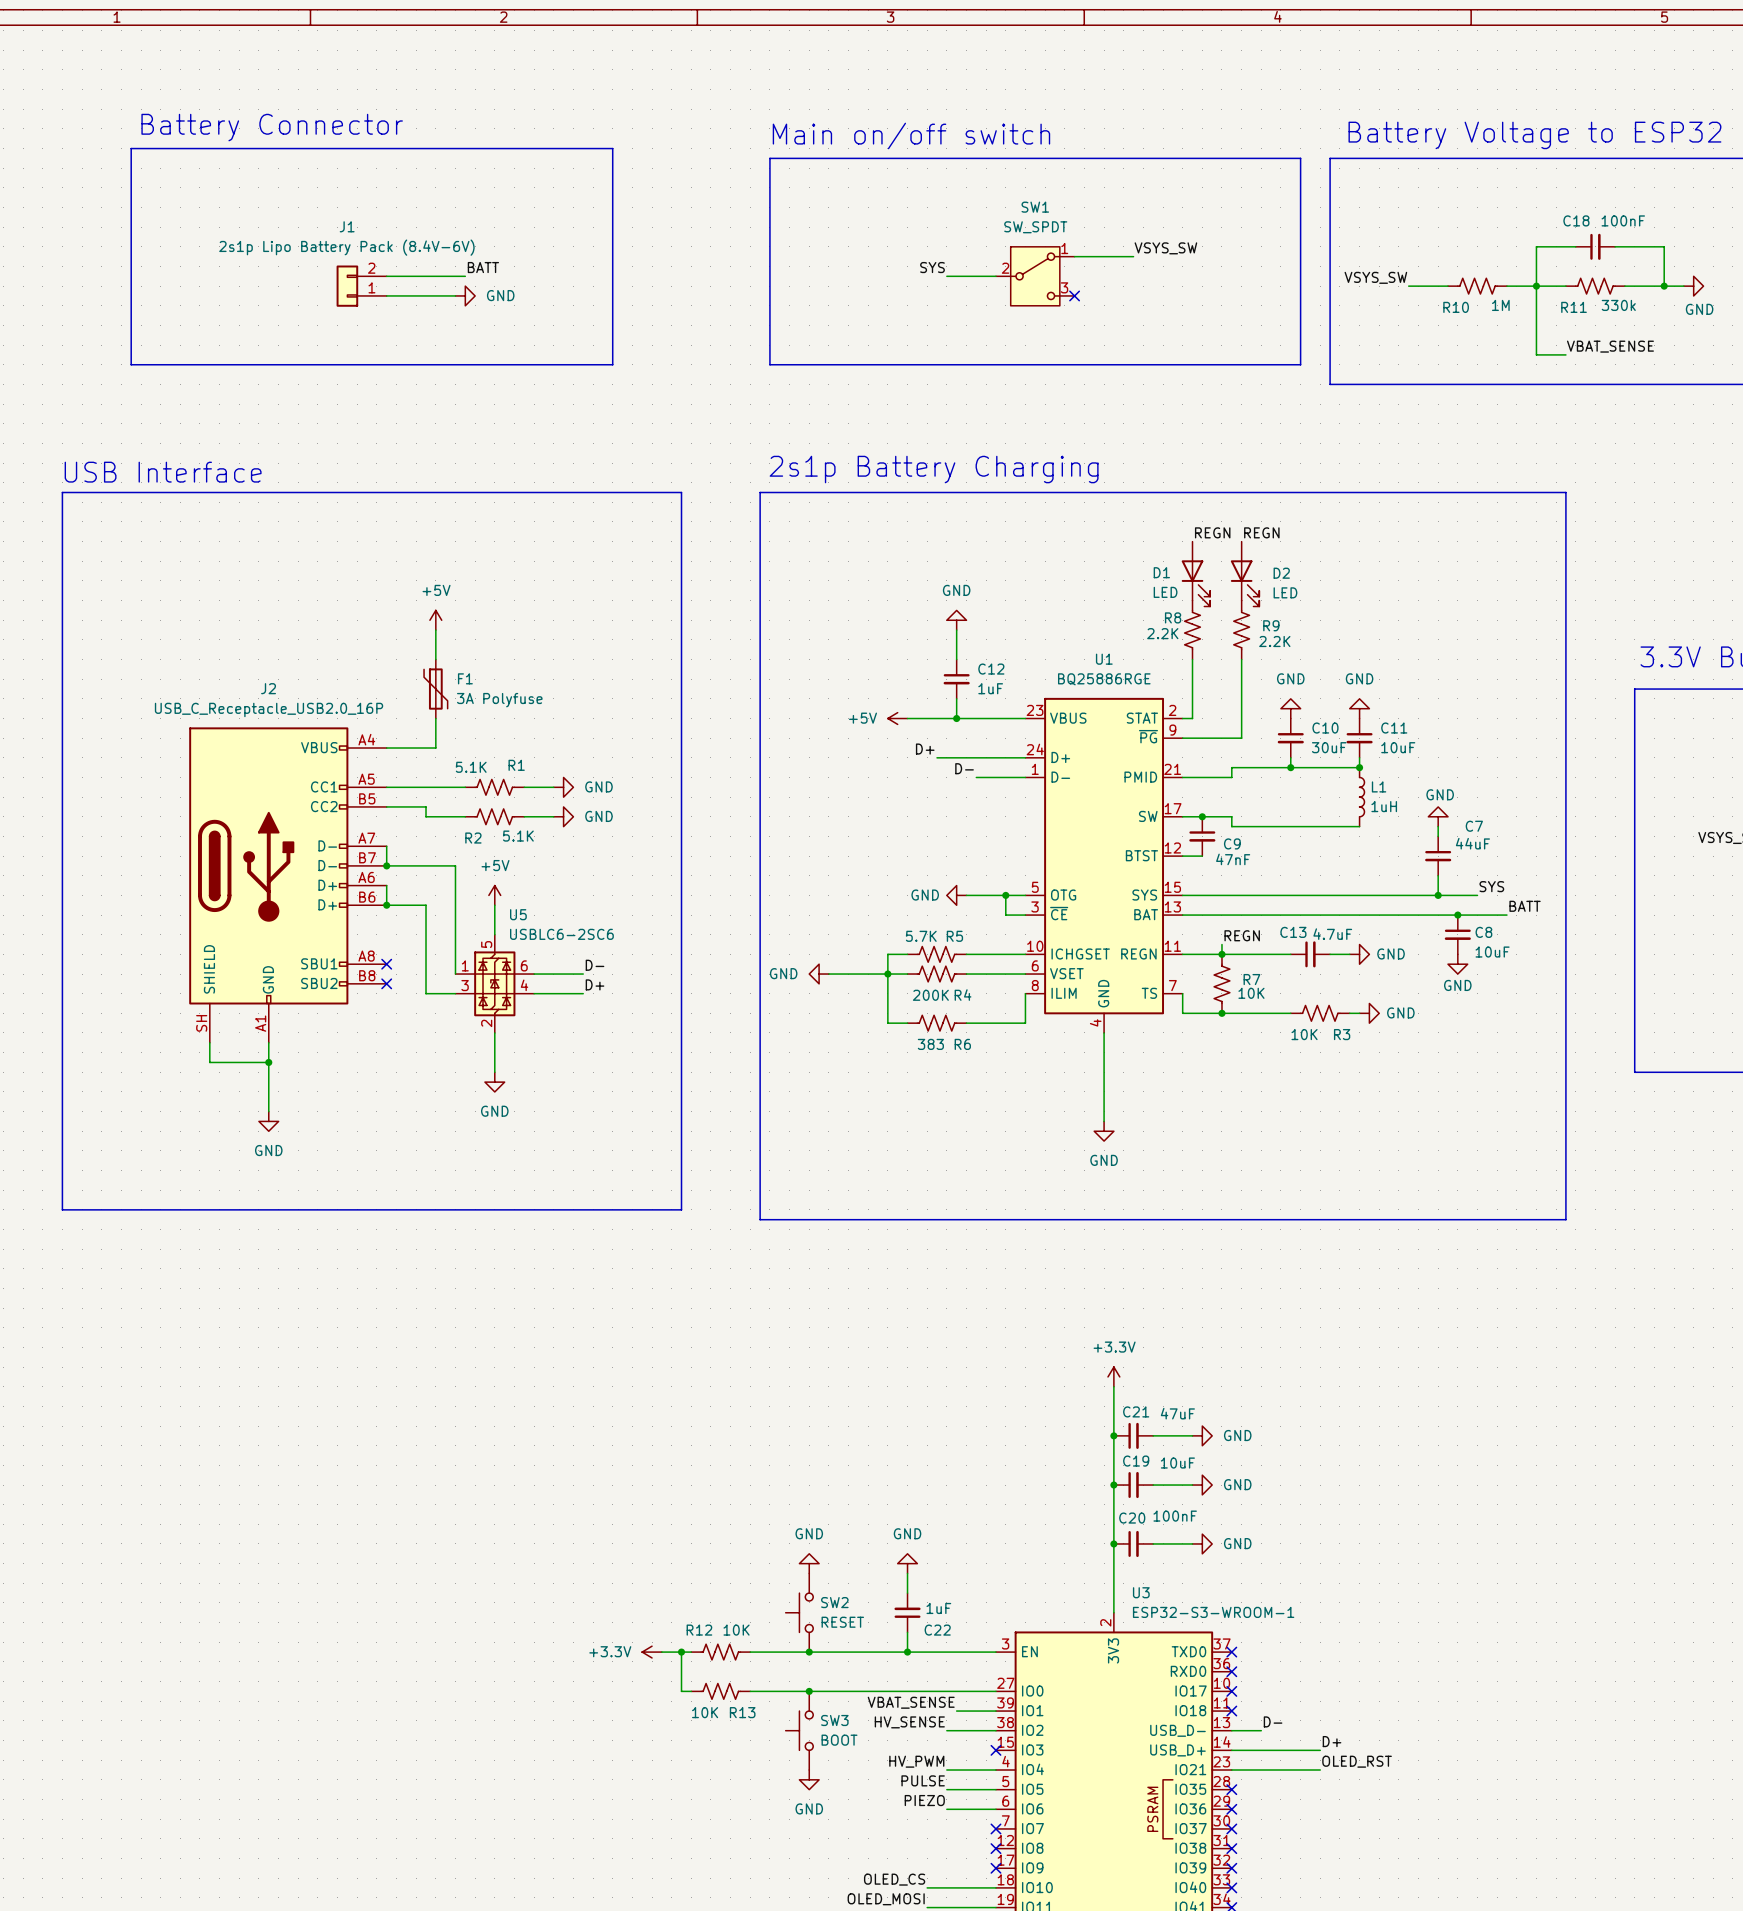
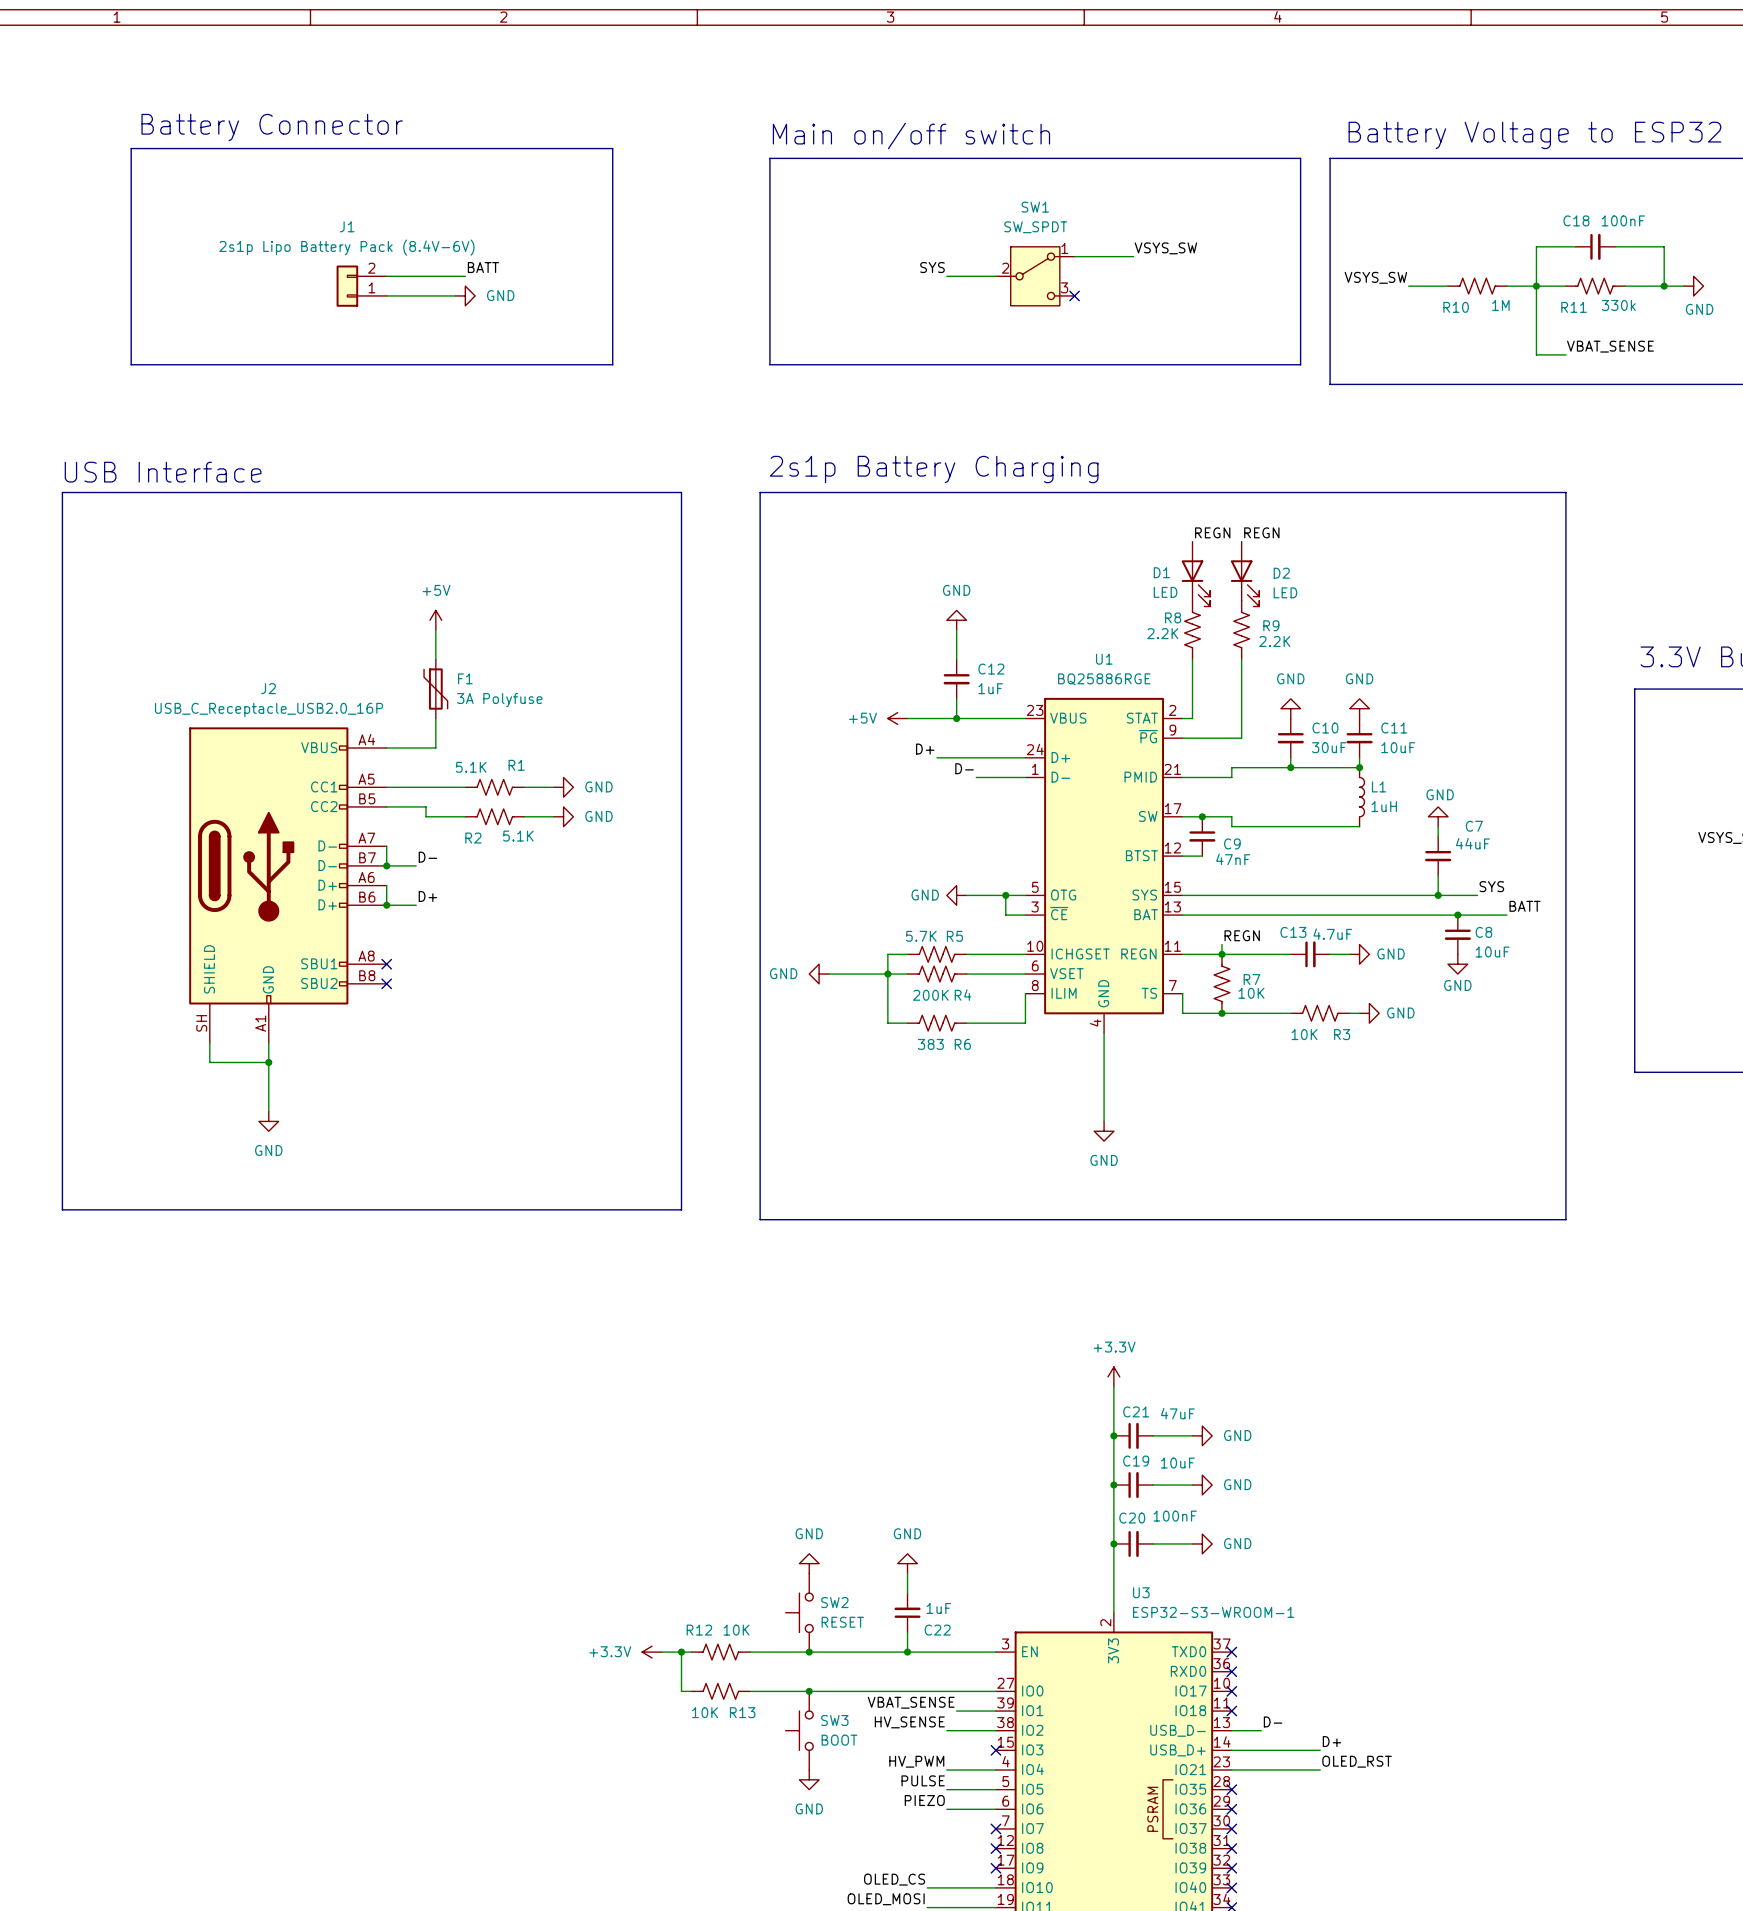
label: none -> D- (427, 857)
wire: (416, 865) (455, 865) (455, 974) -> none
power symbol: +5V (494, 895) -> none
wire: (416, 905) (426, 905) (426, 993) (455, 993) -> none
wire: (494, 905) (494, 934) -> none
label: D- (595, 965) -> none
wire: (534, 974) (583, 974) -> none
U5: USBLC6-2SC6 (494, 983) -> none
label position: D+ (595, 984) -> D+ (427, 896)
wire: (534, 993) (583, 993) -> none
wire: (494, 1032) (494, 1072) -> none
power symbol: GND (494, 1082) -> none

